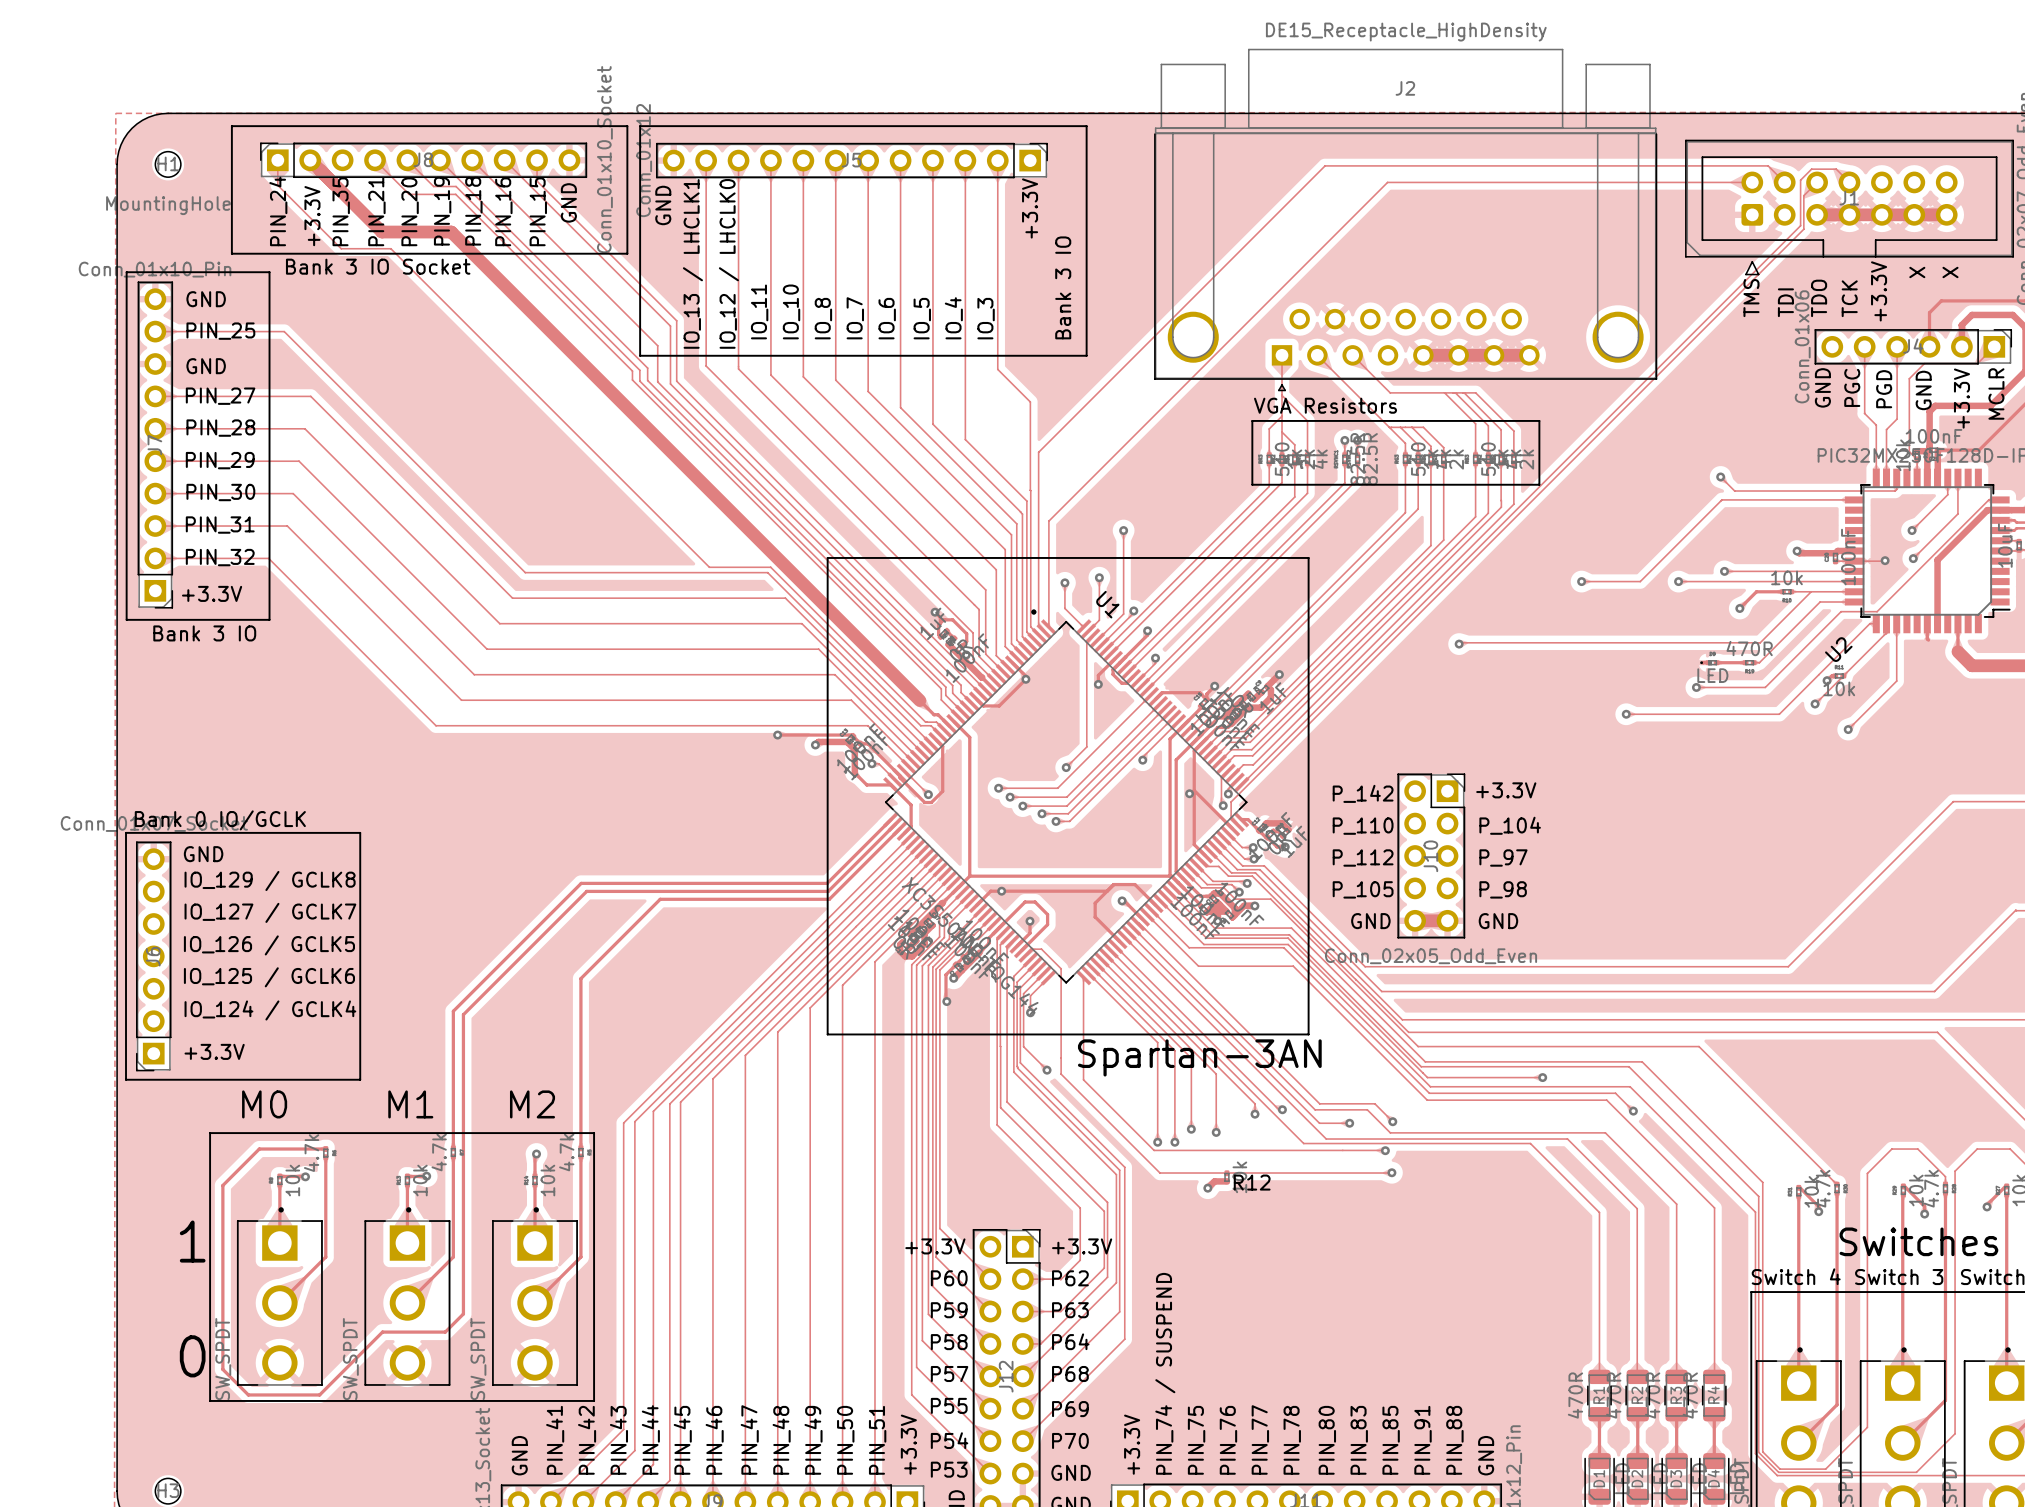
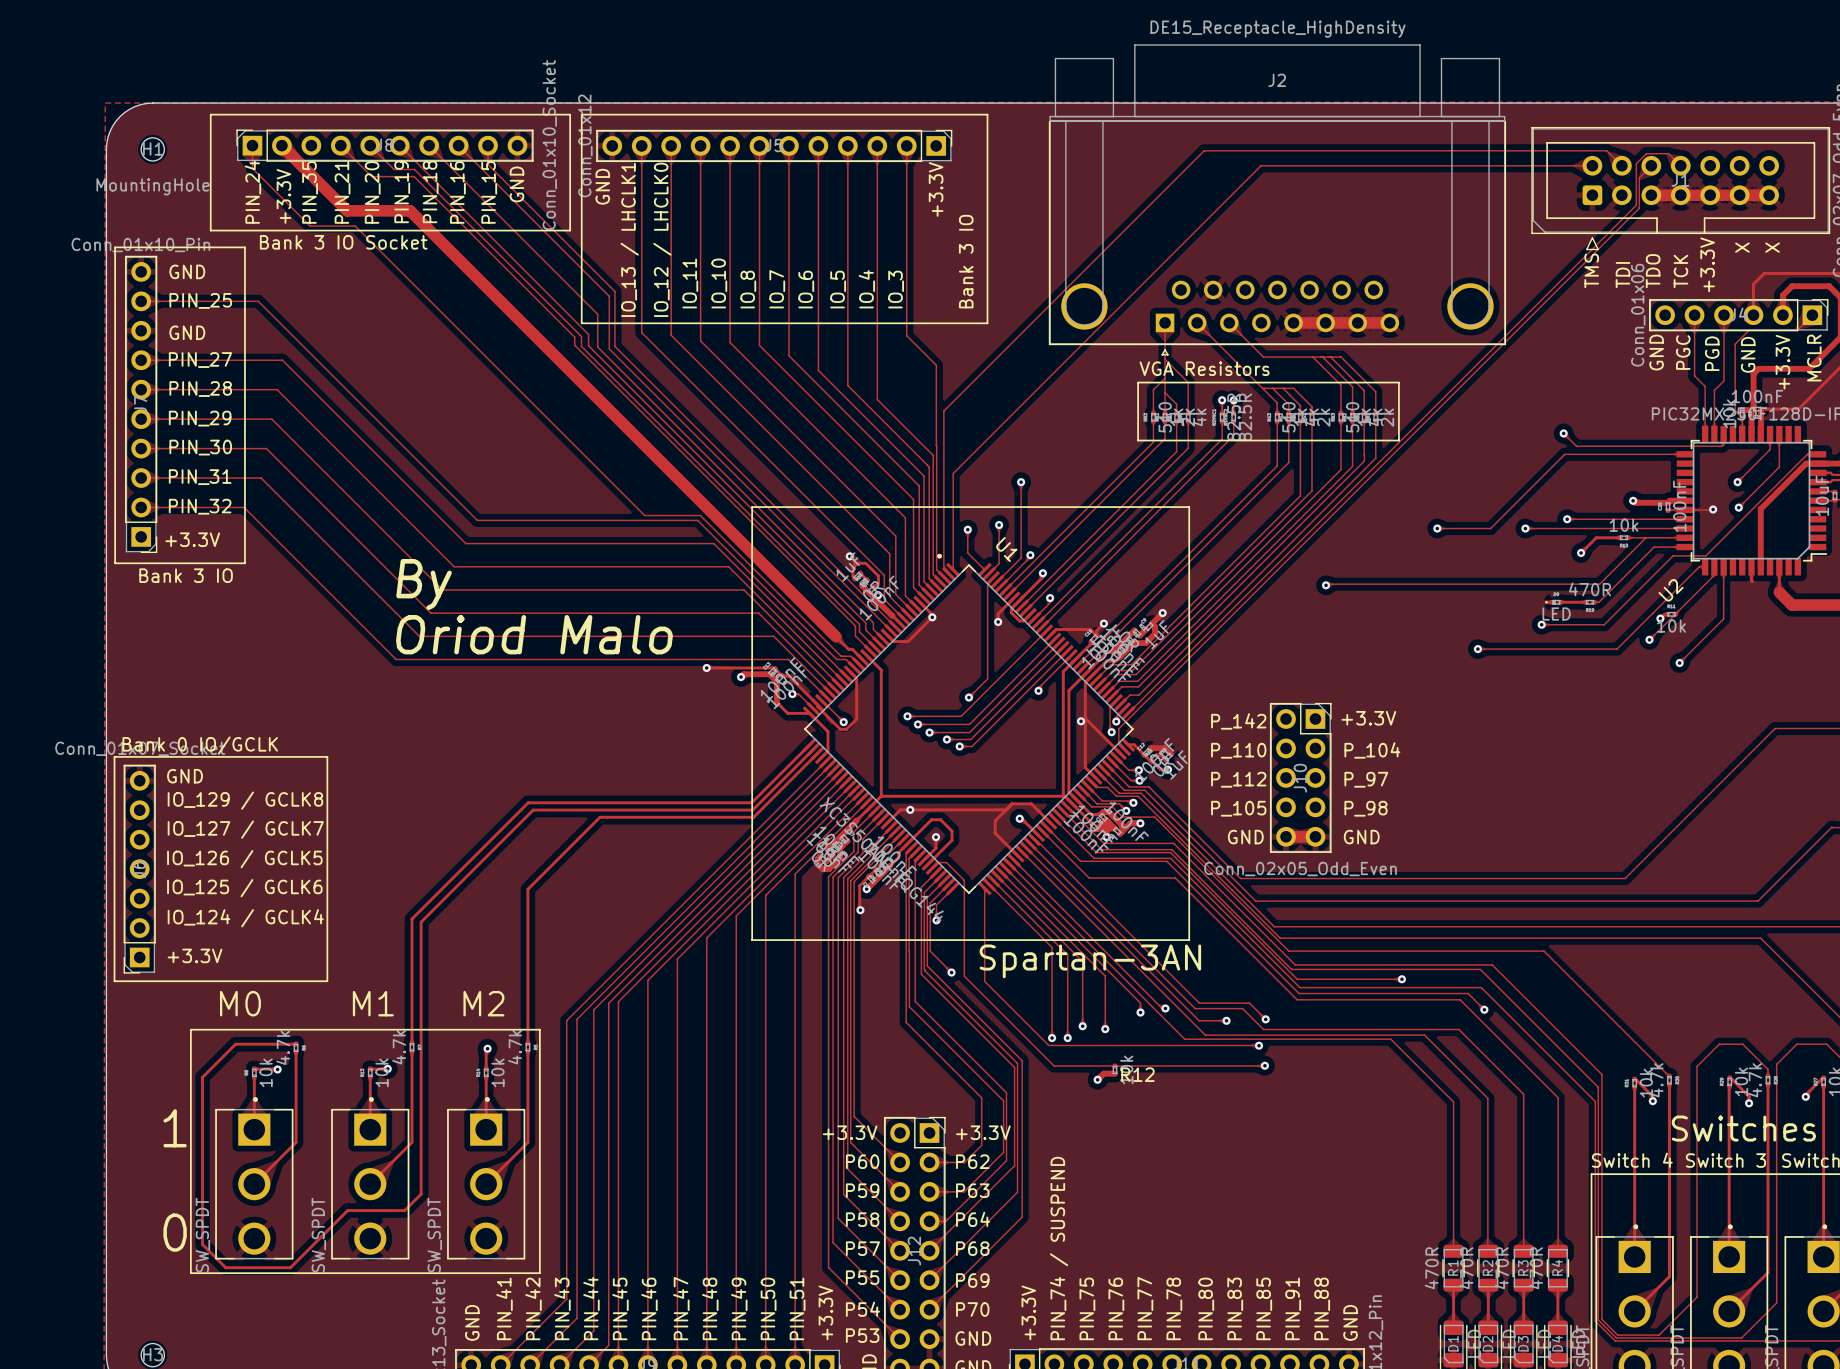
text: none -> By (424, 584)
text: none -> Oriod Malo (534, 634)

